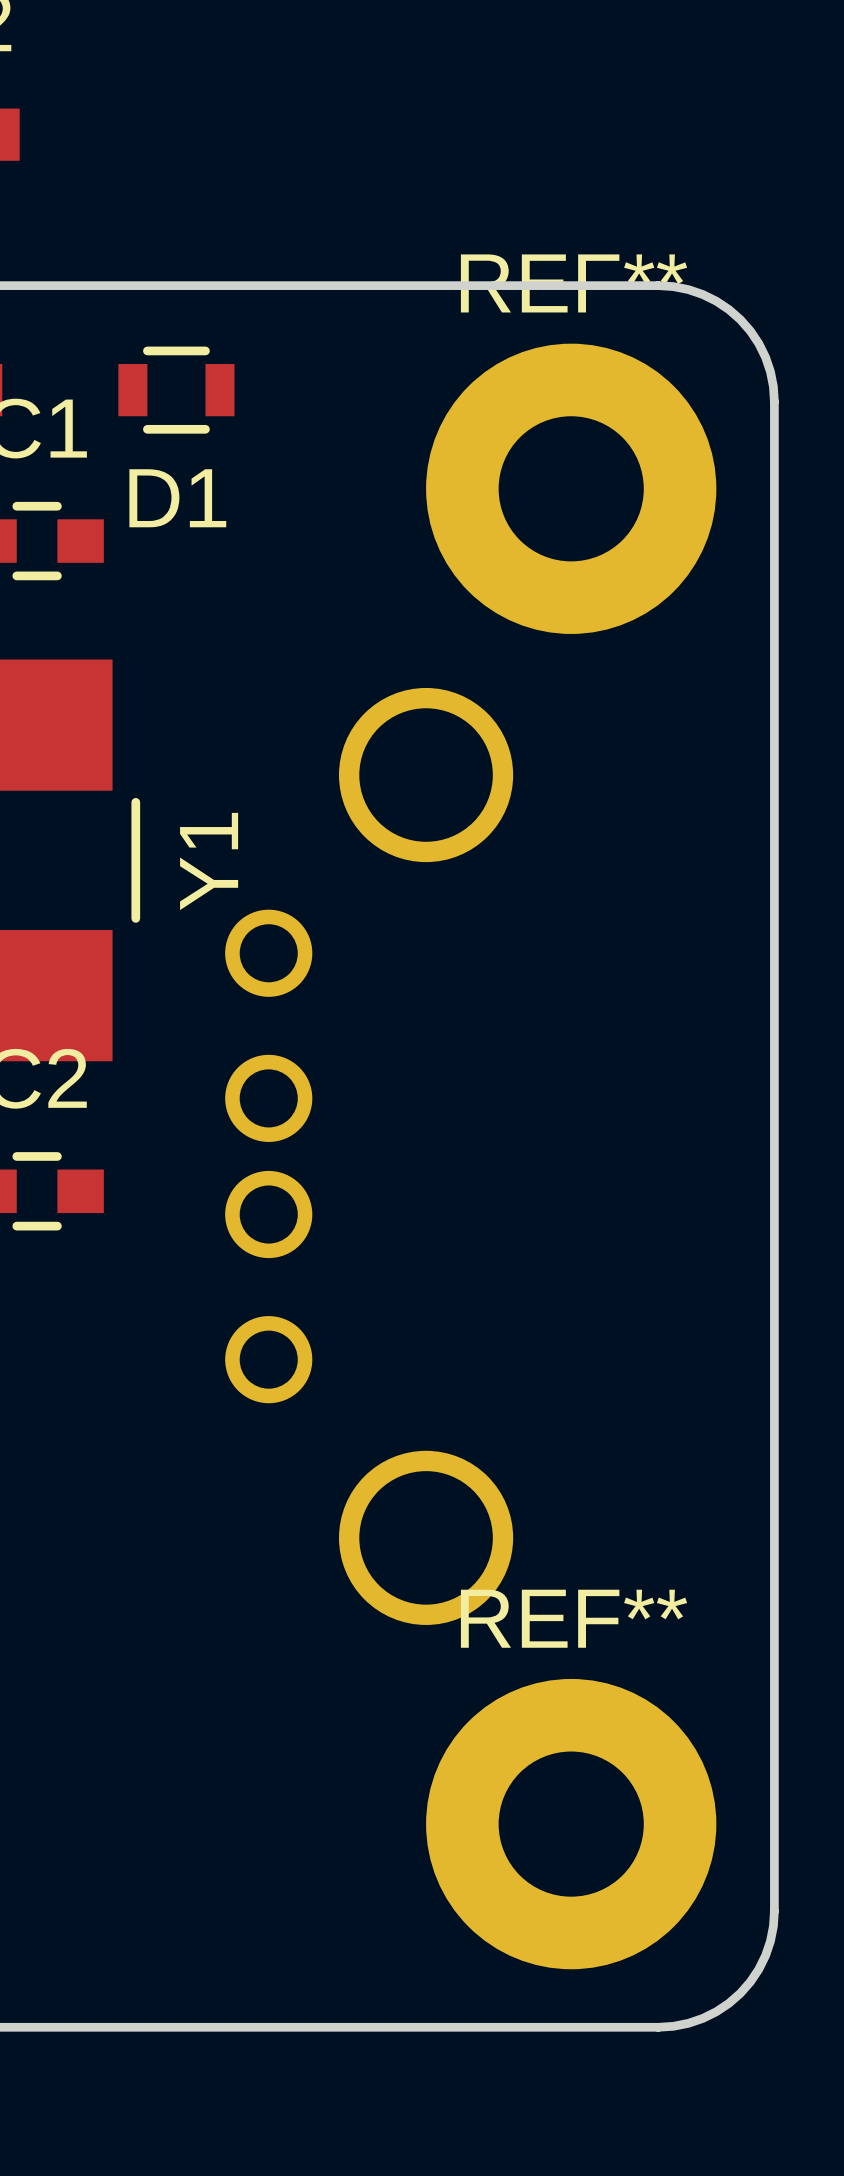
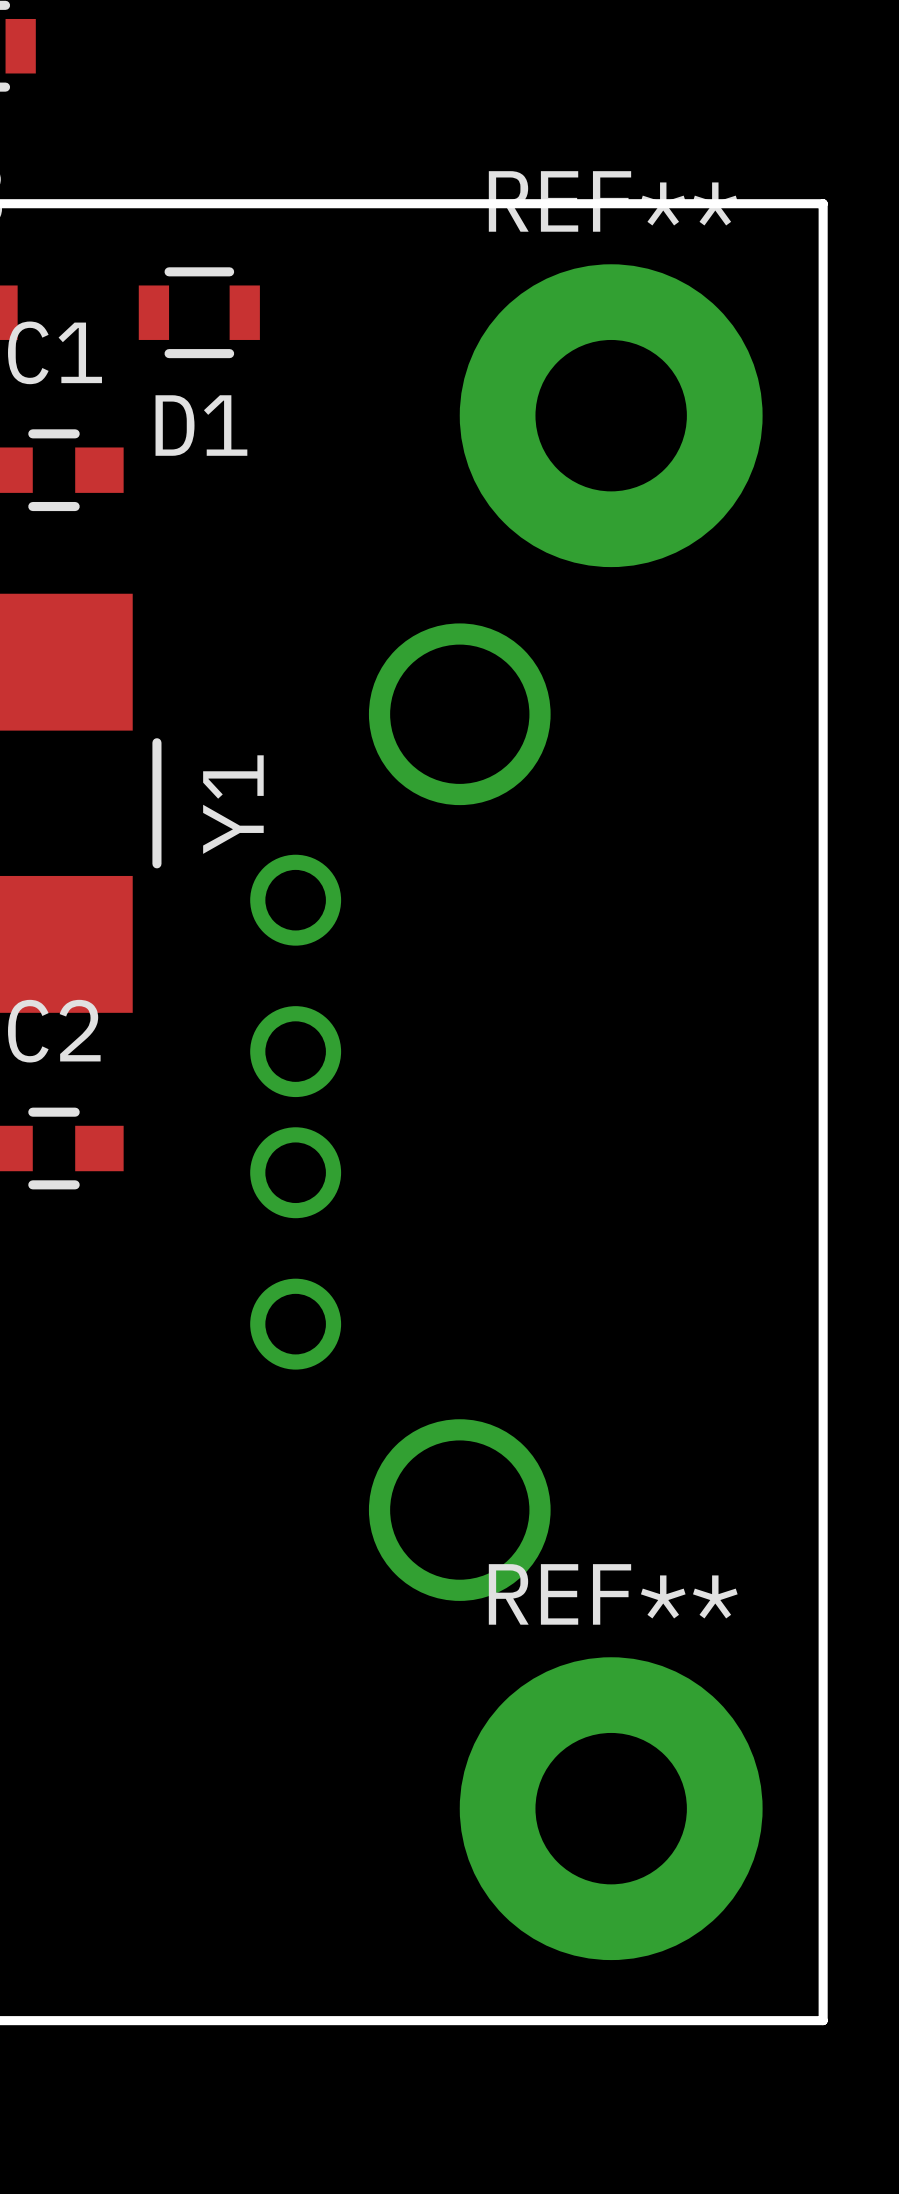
board edge: (658, 285) (688, 289) (702, 294) (728, 309) (740, 319) (758, 343) (765, 357) (770, 371) (774, 401) -> (702, 203) (823, 203) (823, 324)
board edge: (774, 1911) (770, 1941) (765, 1955) (758, 1969) (740, 1993) (716, 2011) (702, 2018) (688, 2023) (658, 2027) -> (823, 1899) (823, 2020) (702, 2020)

